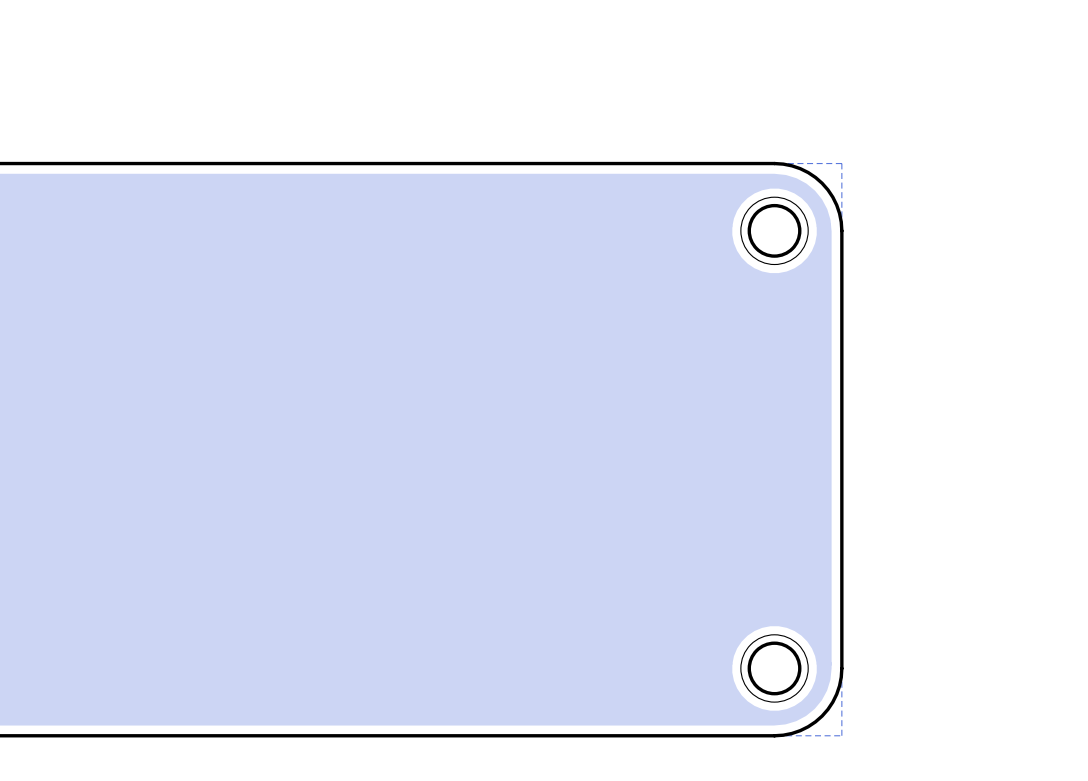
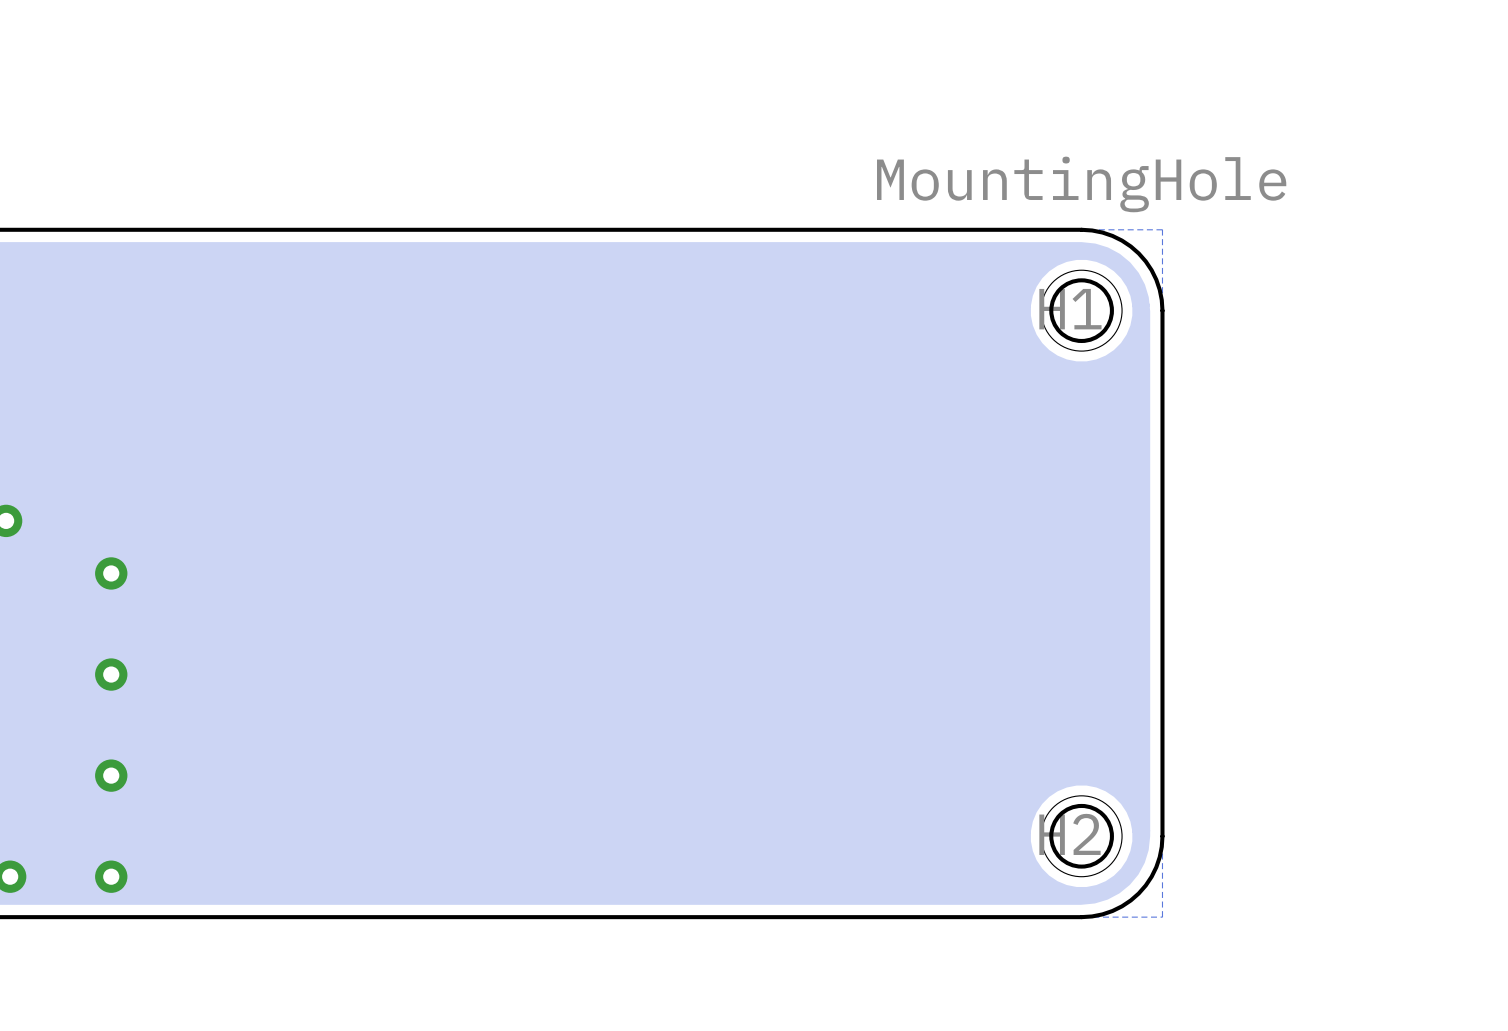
H1 value: none -> MountingHole (1081, 184)
H1 name: none -> H1 (1070, 309)
H2 name: none -> H2 (1069, 834)

